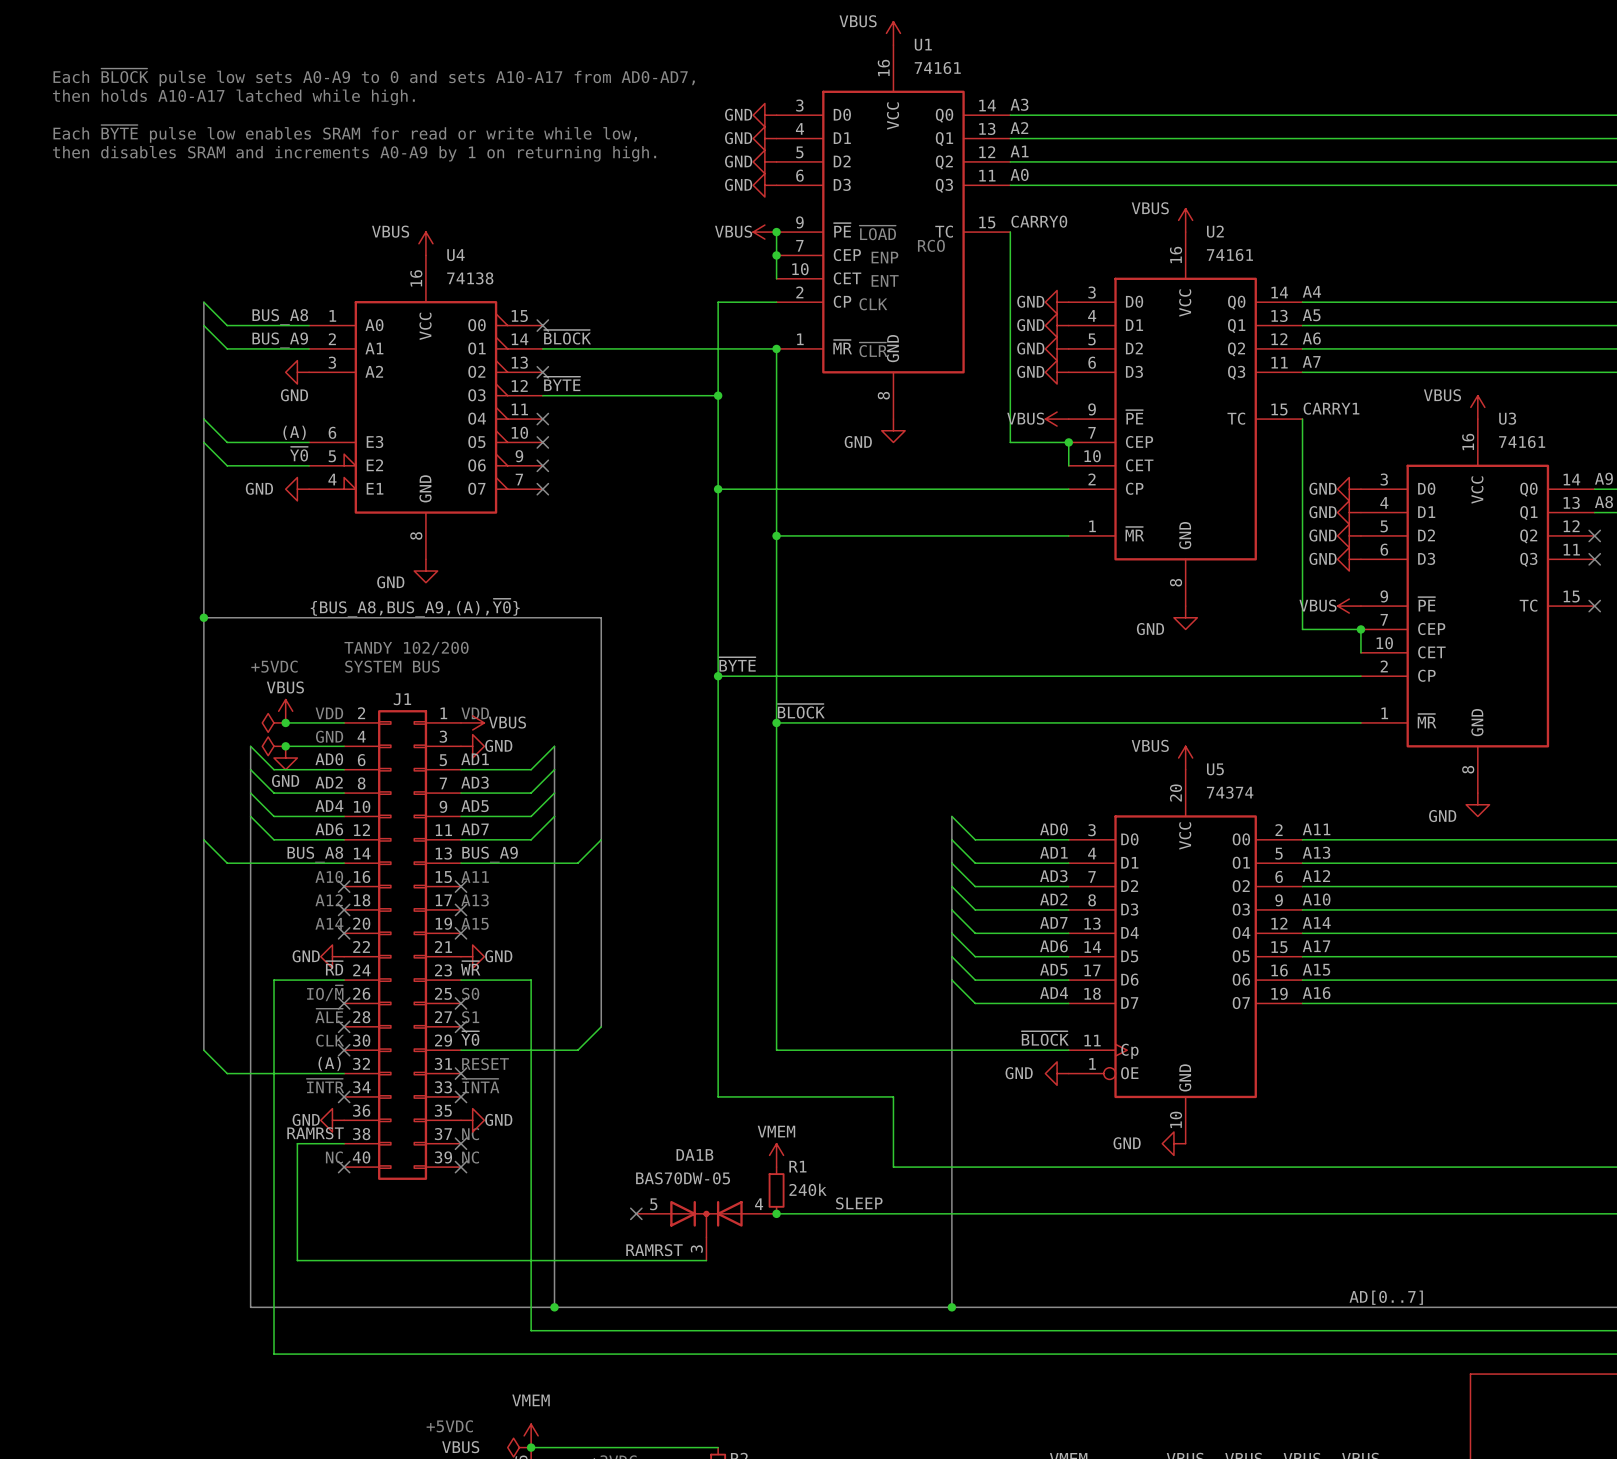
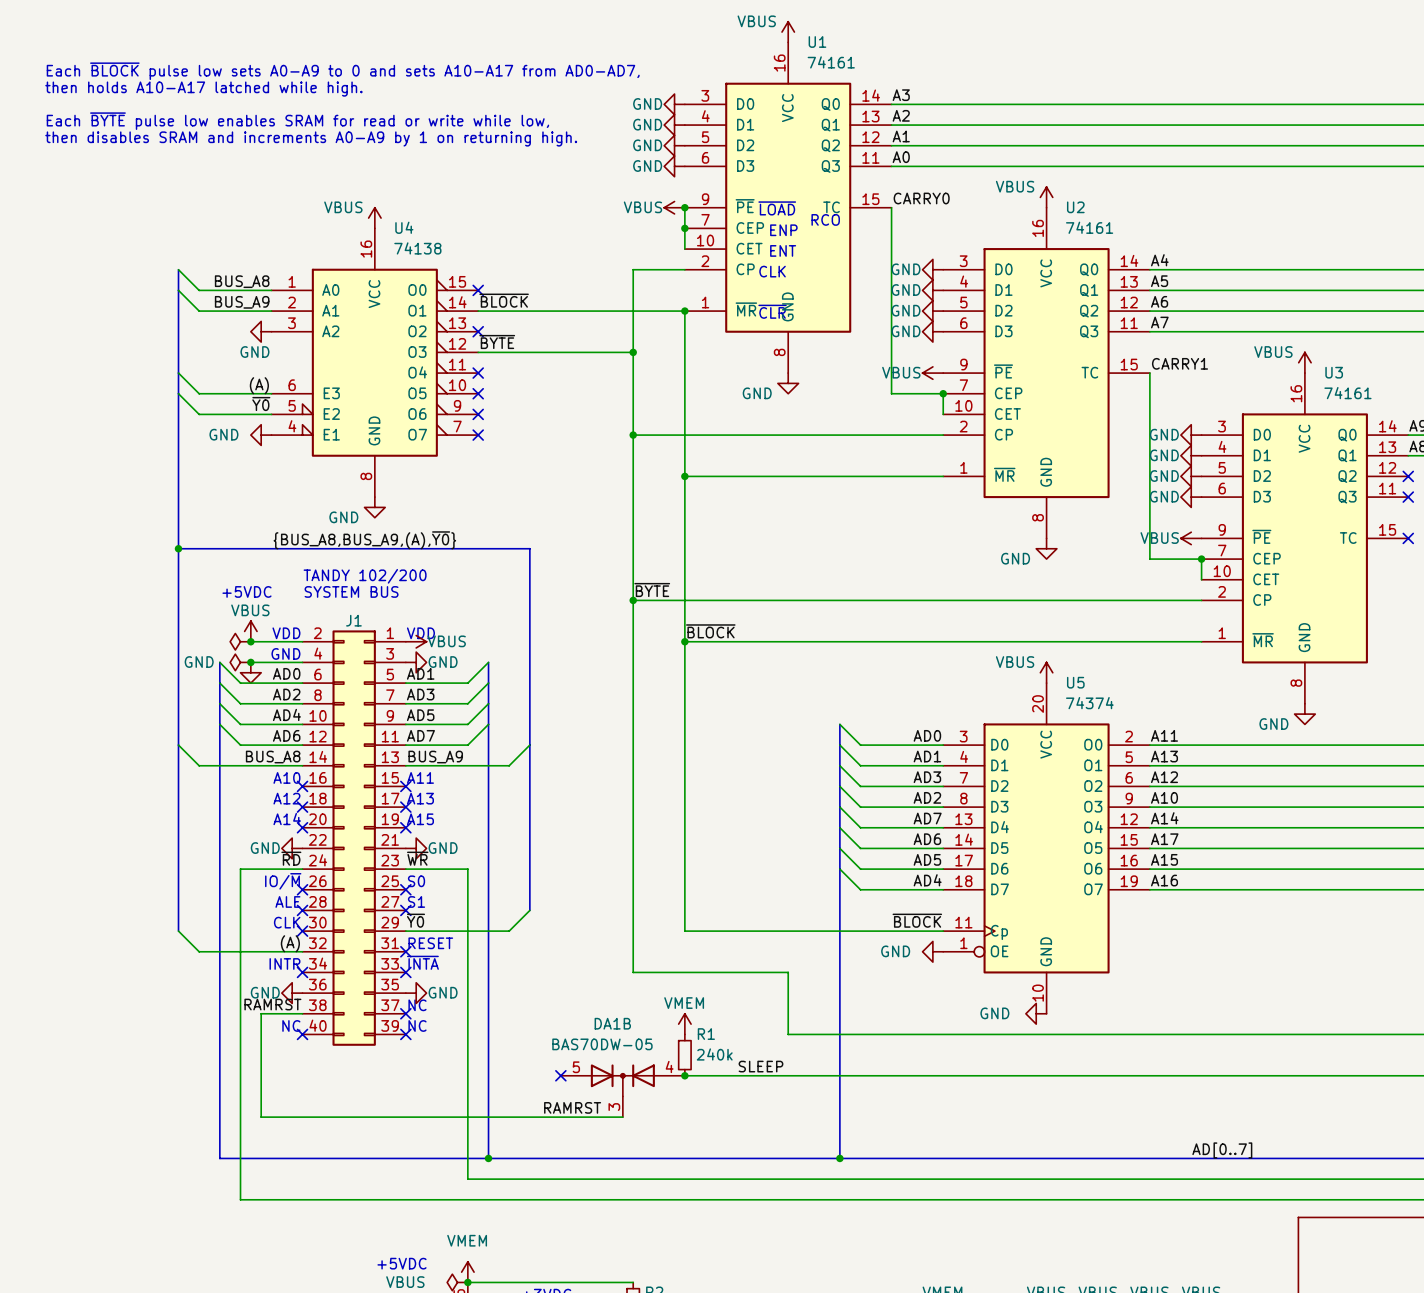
power symbol text position: GND (285, 780) -> GND (199, 662)
text: ~{ALE} (329, 1015) -> ALE (287, 901)
text: ~{INTR} (325, 1086) -> INTR (284, 963)

